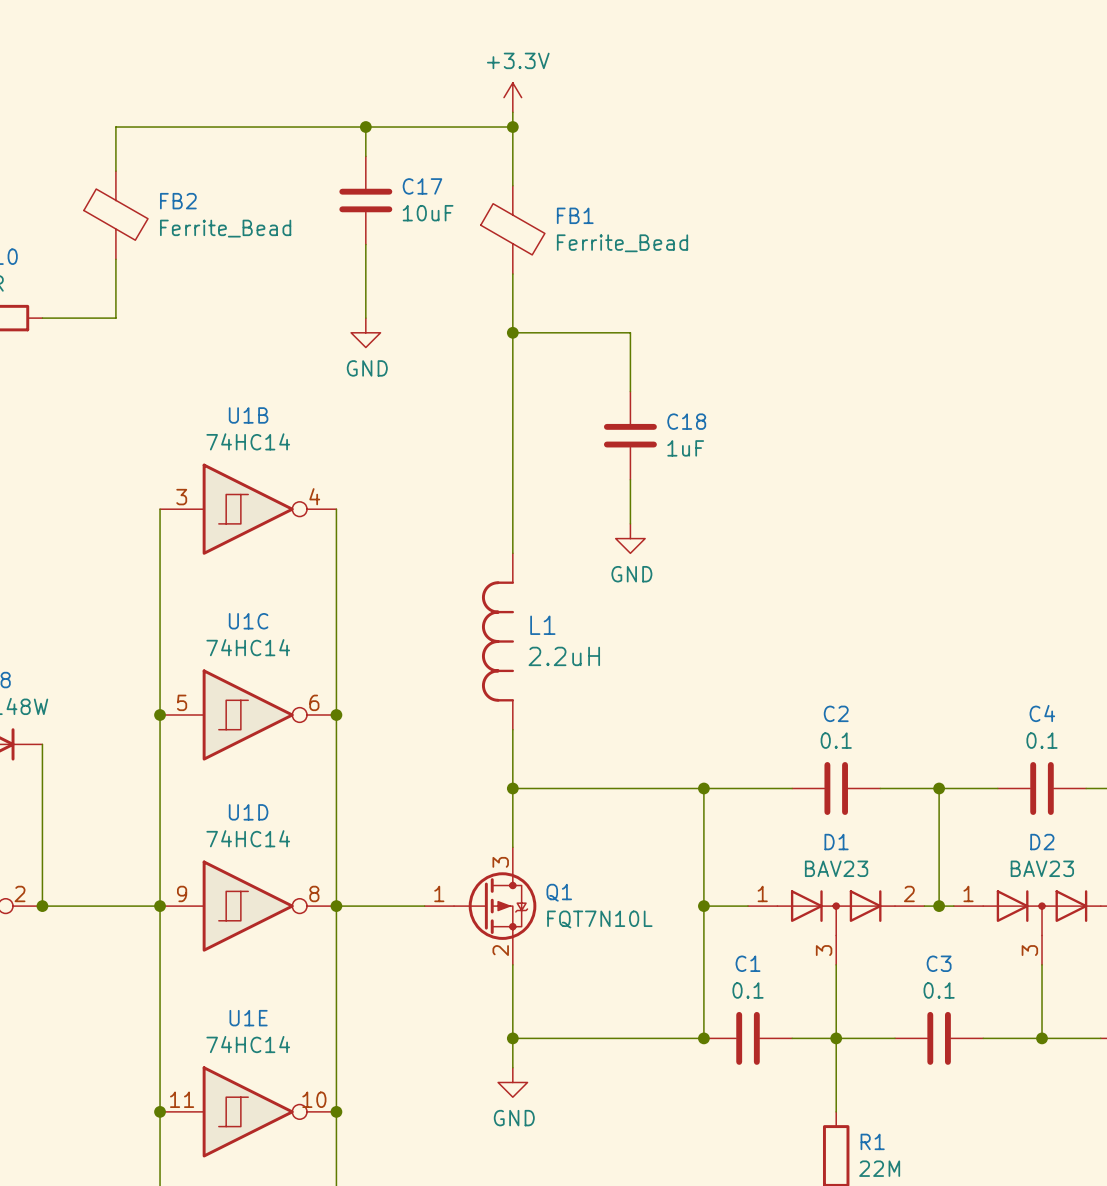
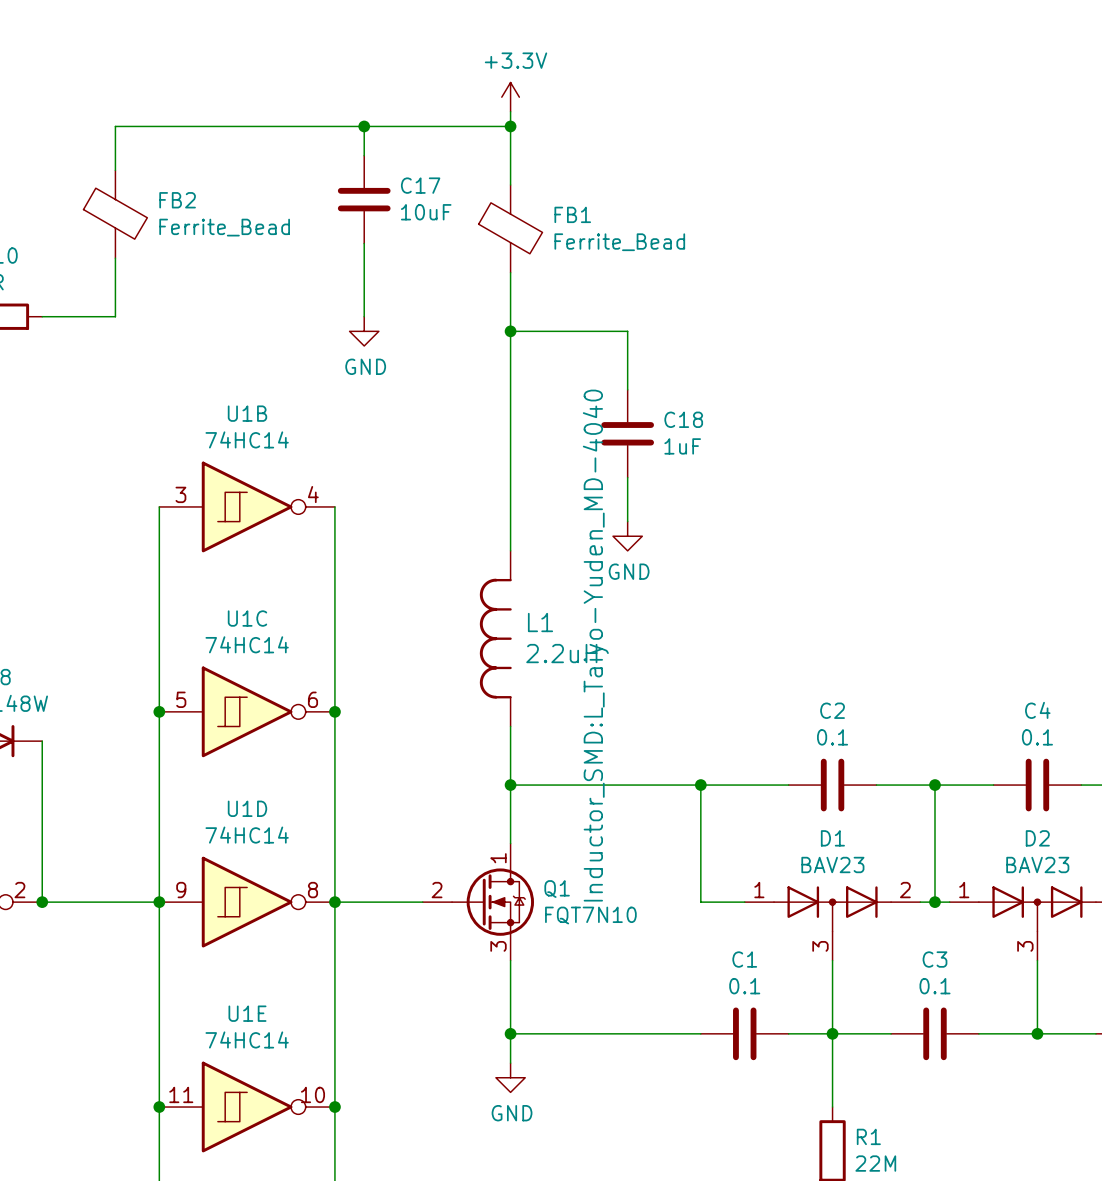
L1 text: none -> Inductor_SMD:L_Taiyo-Yuden_MD-4040 (595, 645)
Q1 symbol: [424, 847, 537, 965] -> [422, 843, 534, 961]
wire: (703, 906) (703, 1038) -> none
junction: (703, 906) -> none
Q1 value: FQT7N10L (599, 919) -> FQT7N10 (590, 915)
junction: (703, 1038) -> none

